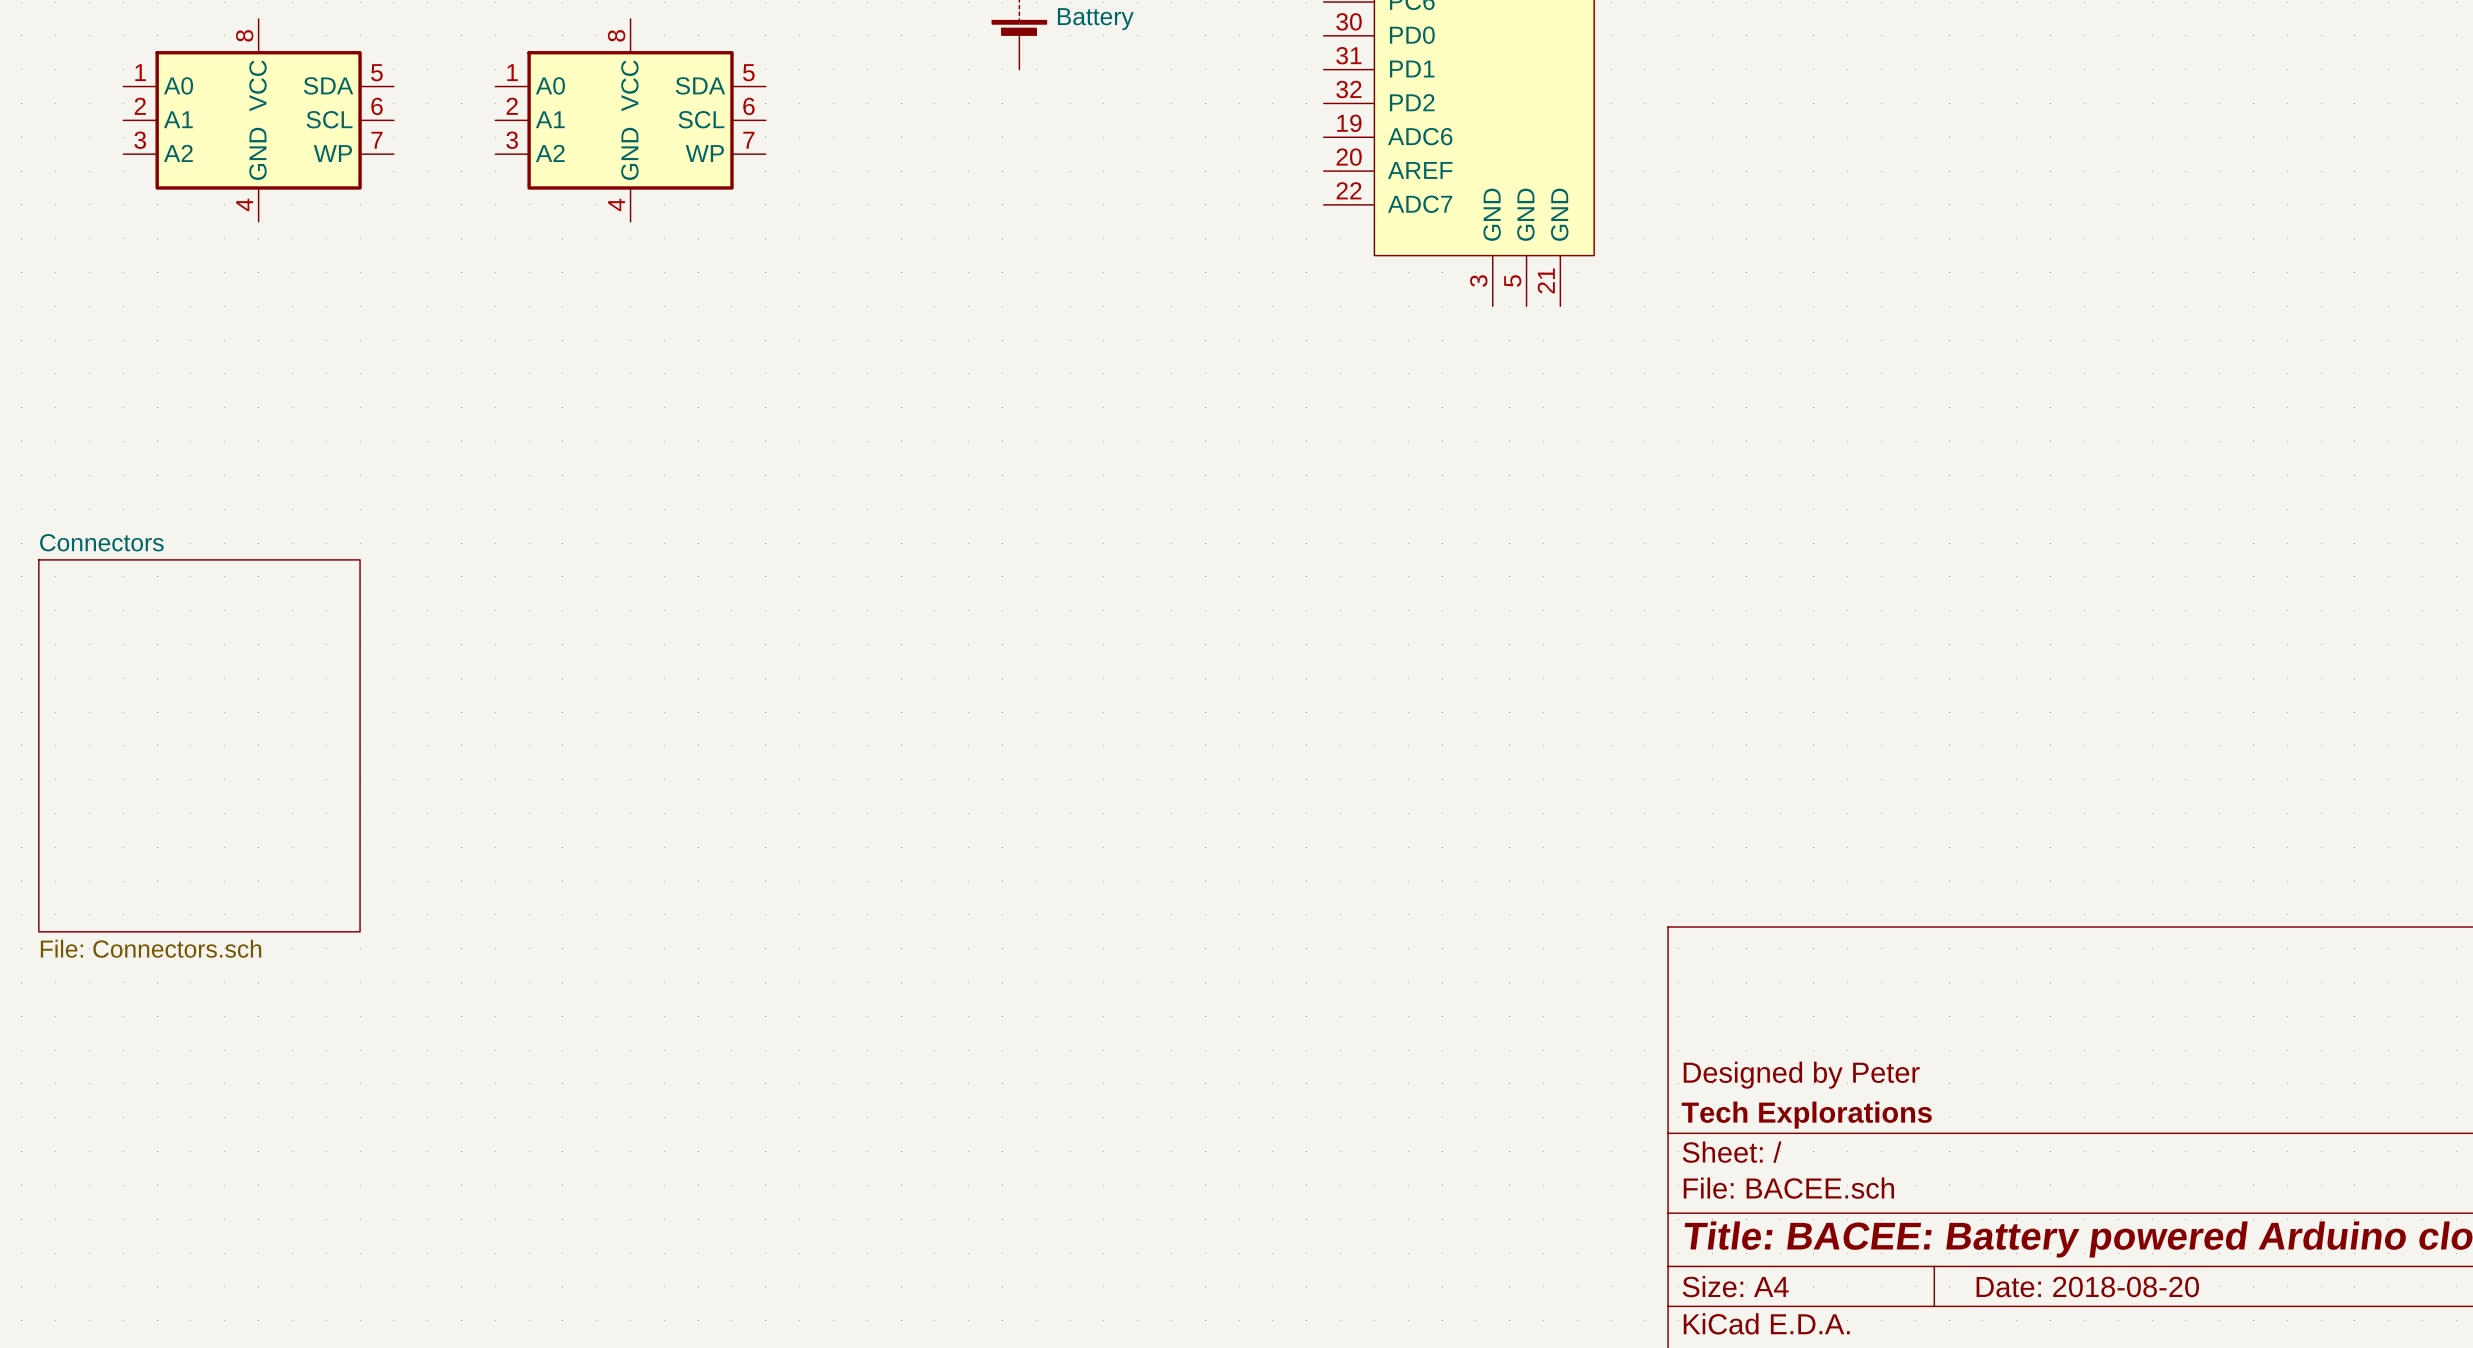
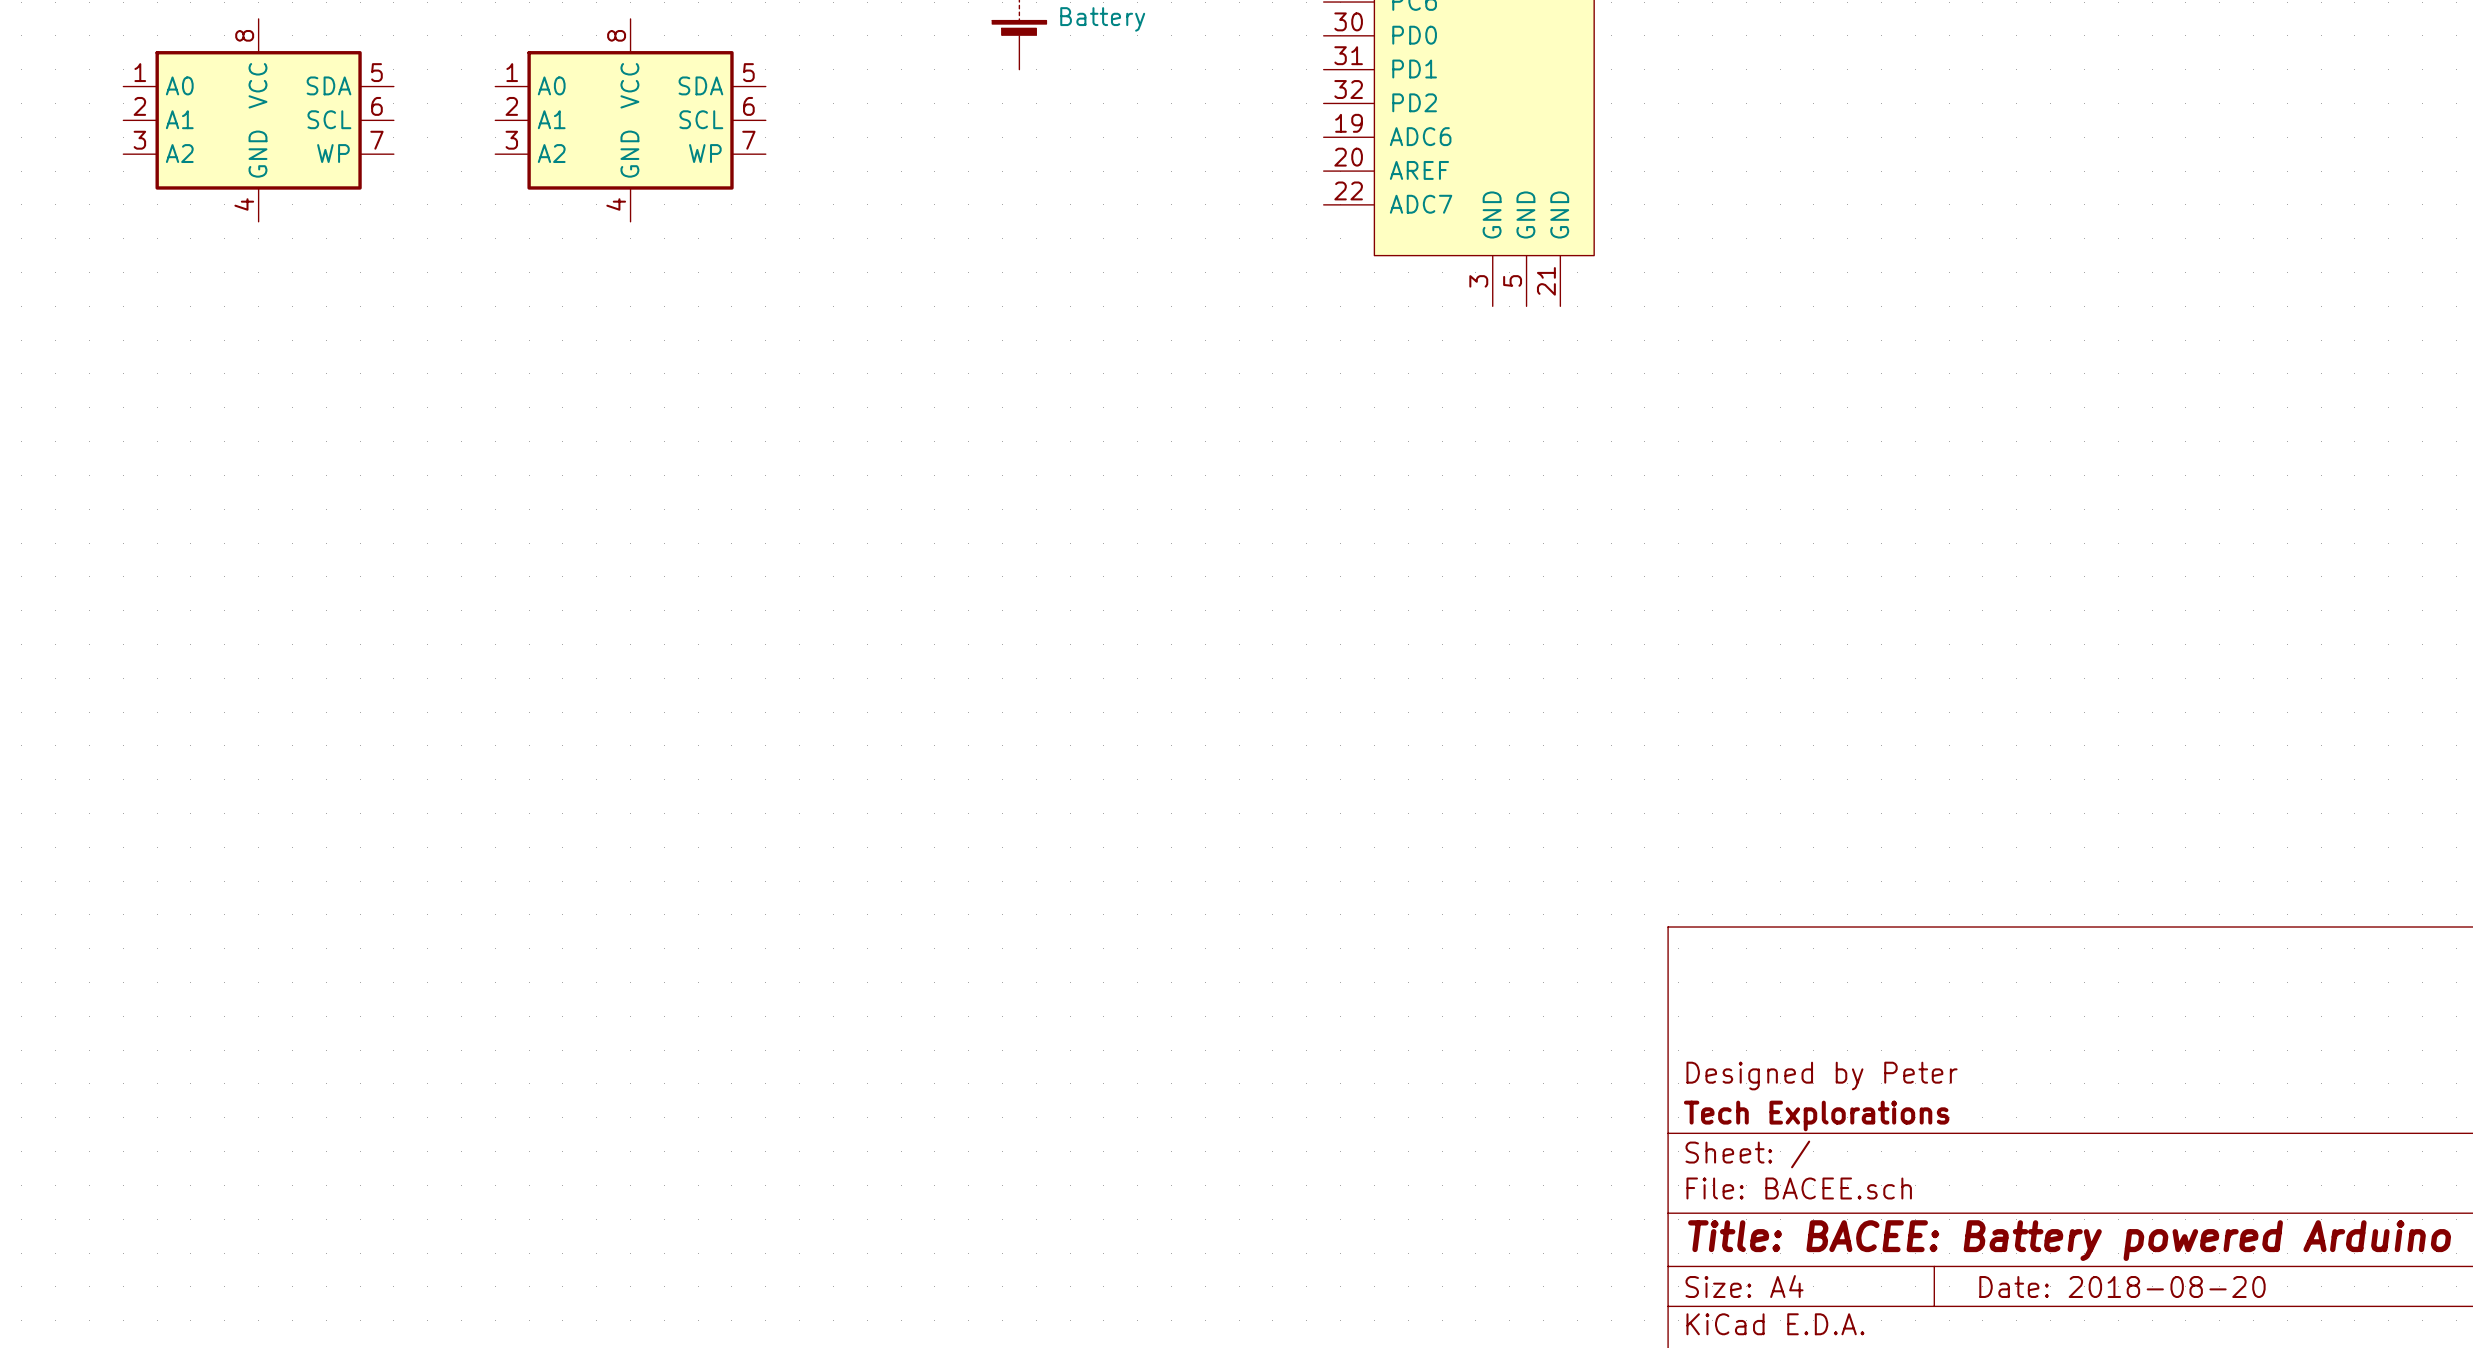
sheet Connectors: File: Connectors.sch (199, 745) -> none

